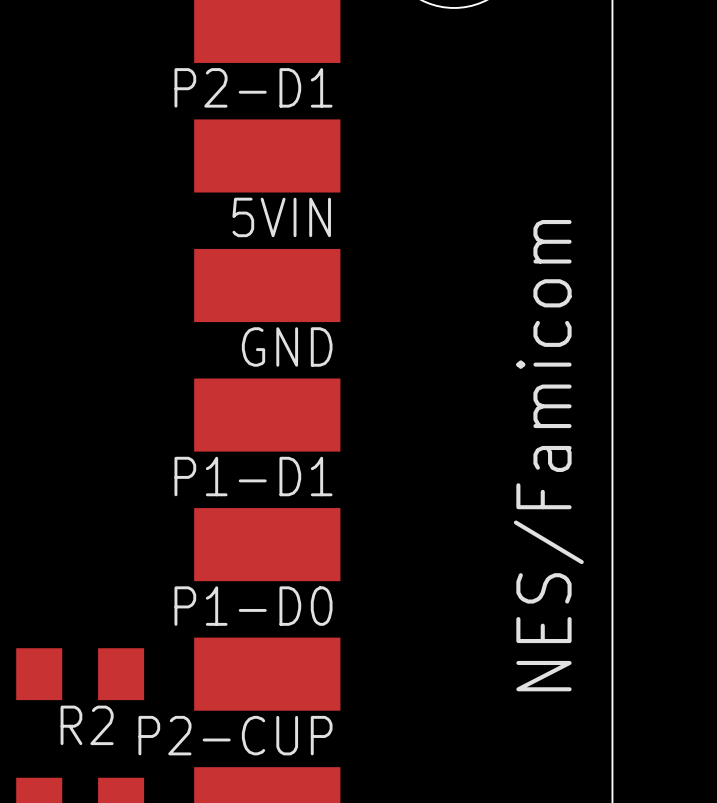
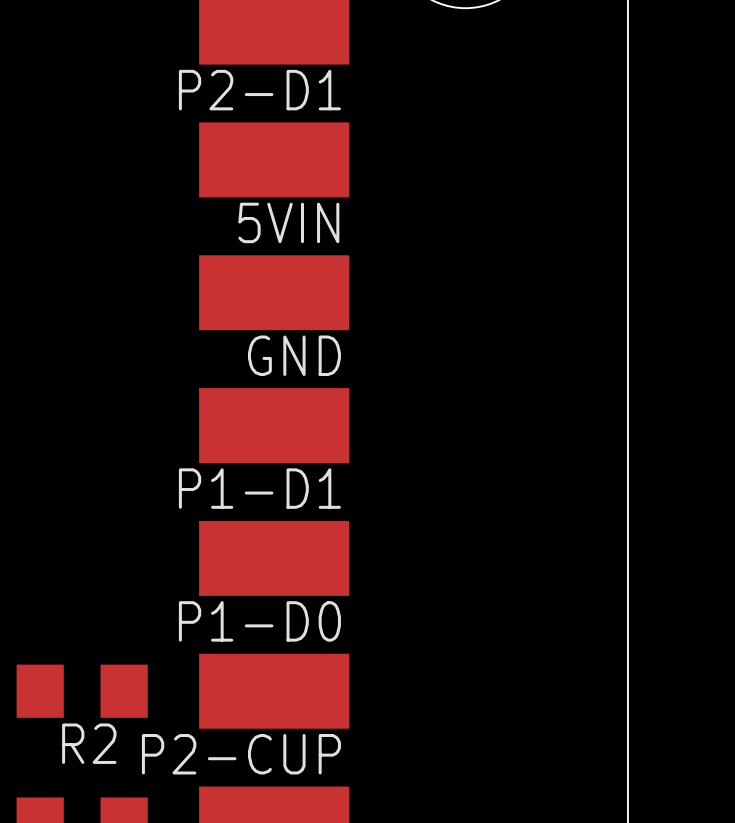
text: NES/Famicom (548, 455) -> none

